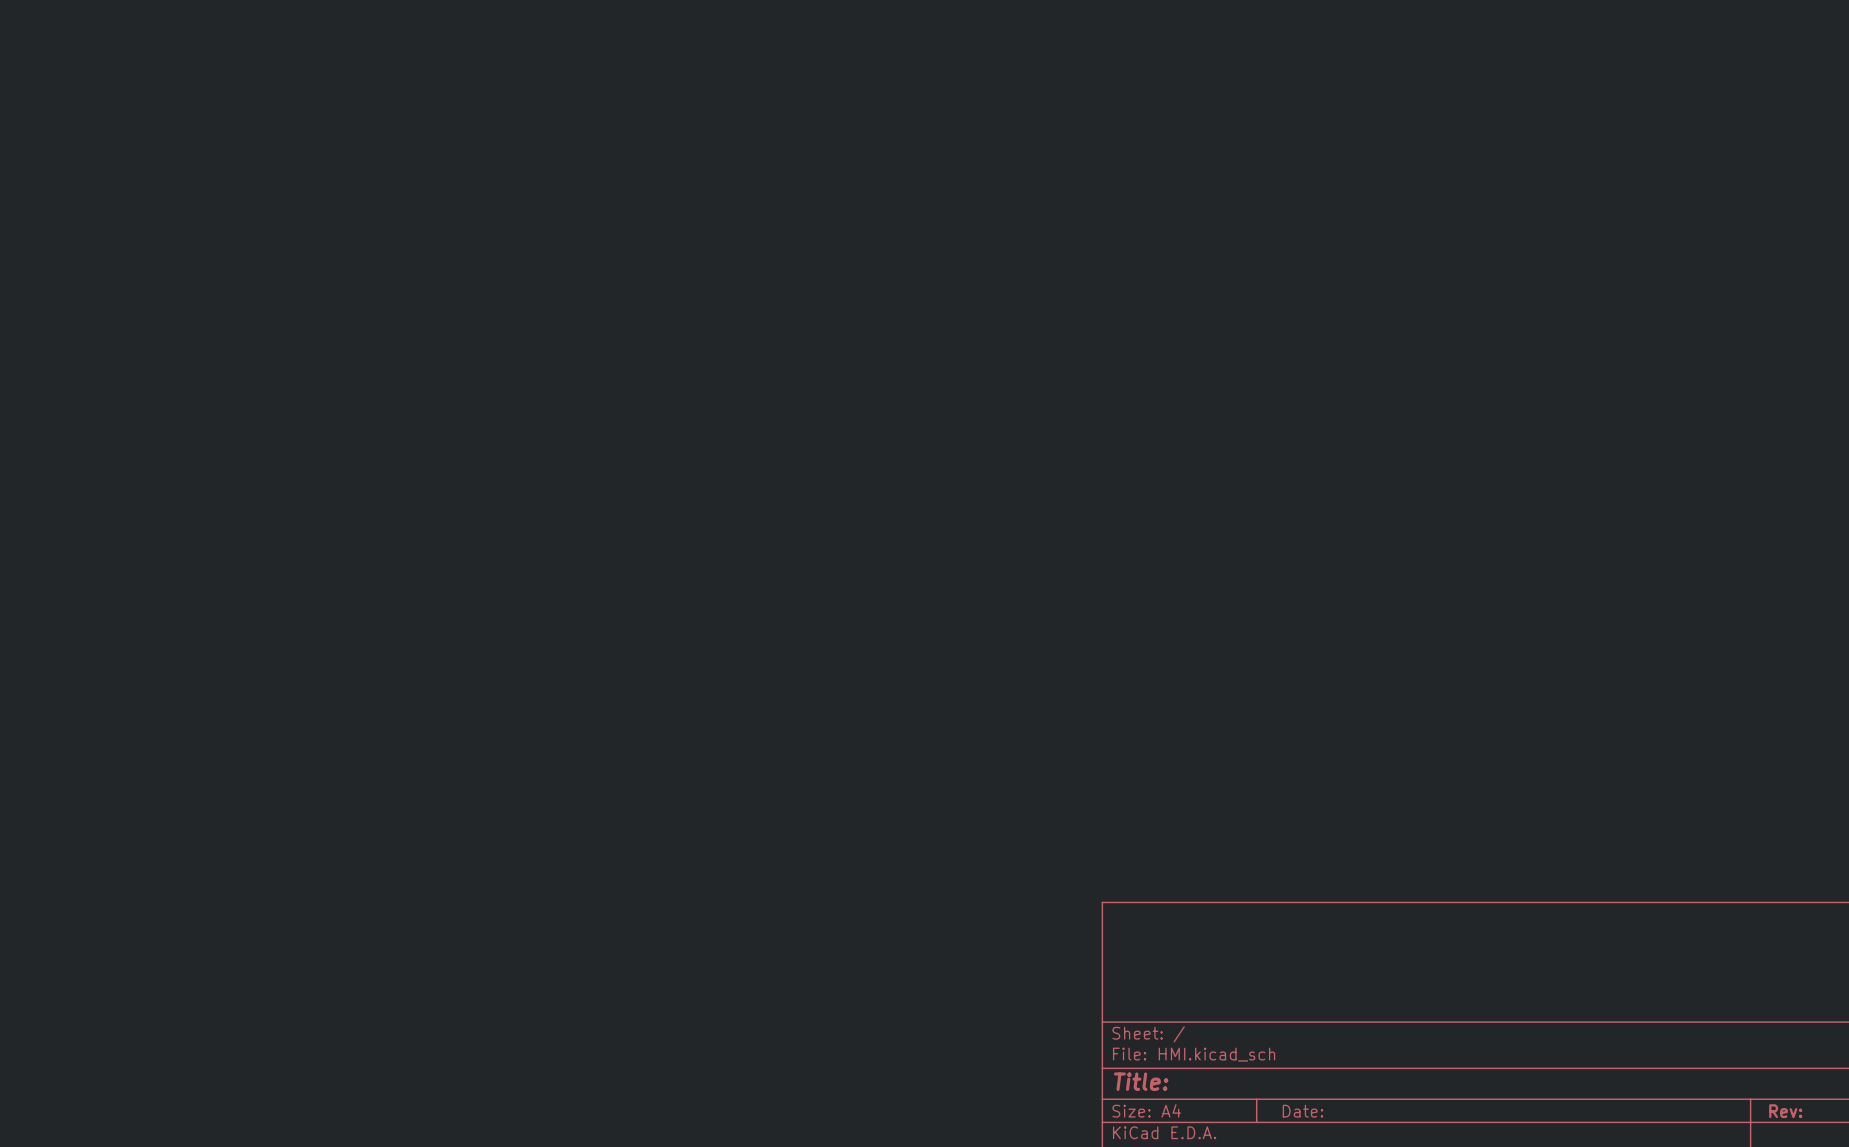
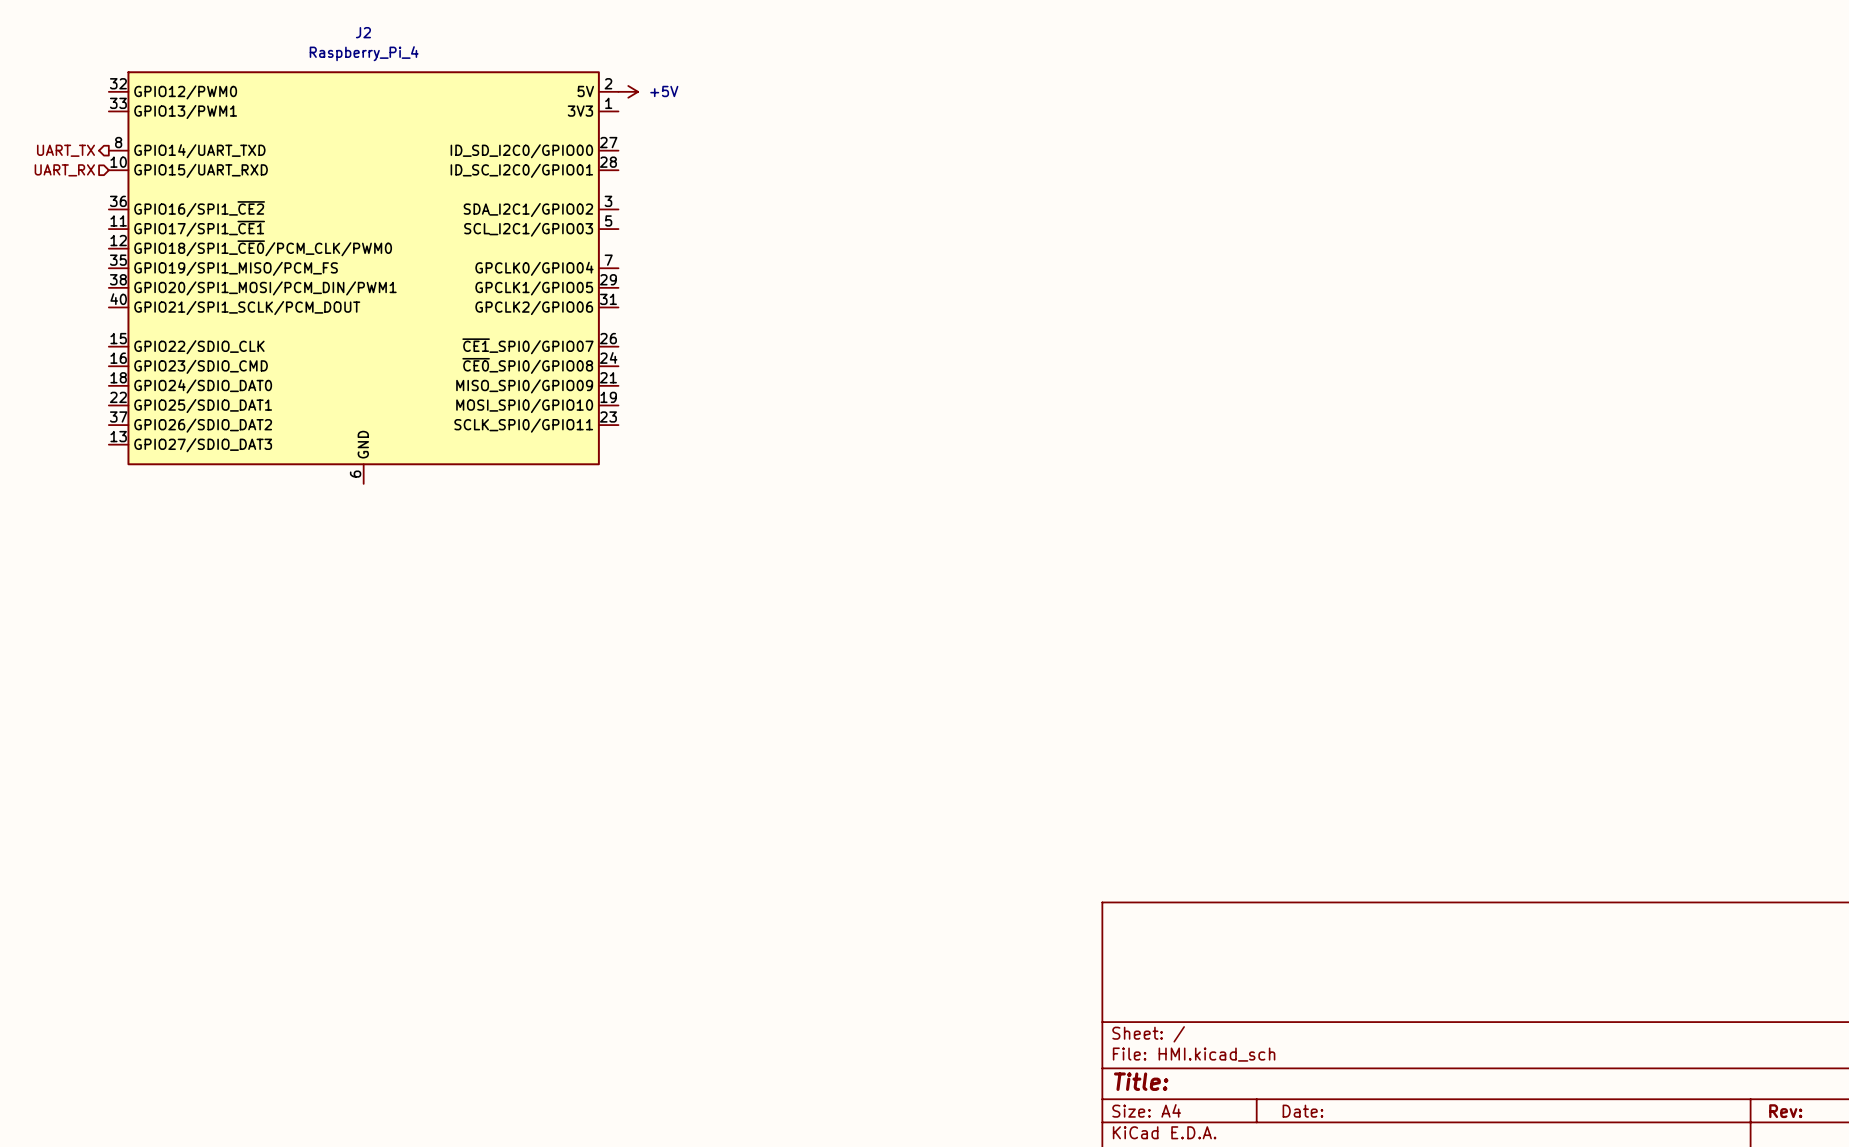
power symbol: none -> +5V (628, 91)
hierarchical label: none -> UART_TX (65, 150)
hierarchical label: none -> UART_RX (64, 170)
J2: none -> Raspberry_Pi_4 (363, 277)

